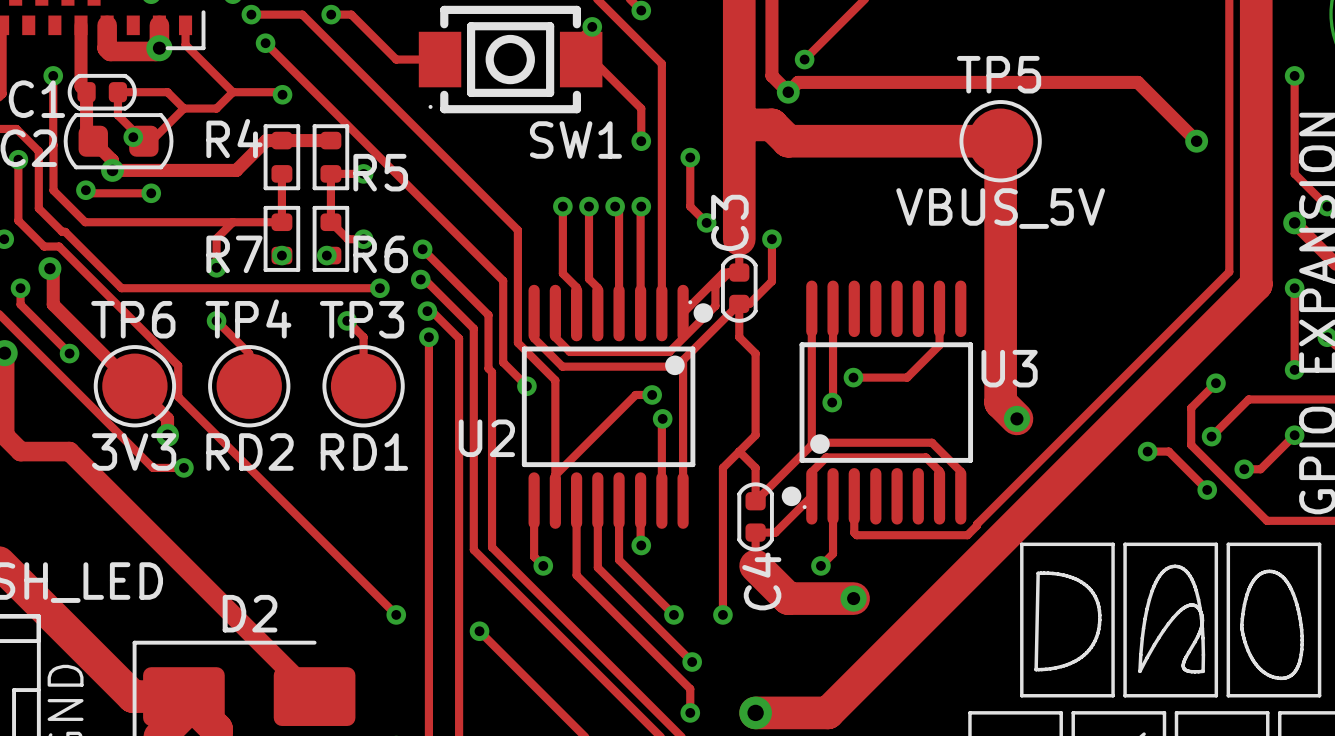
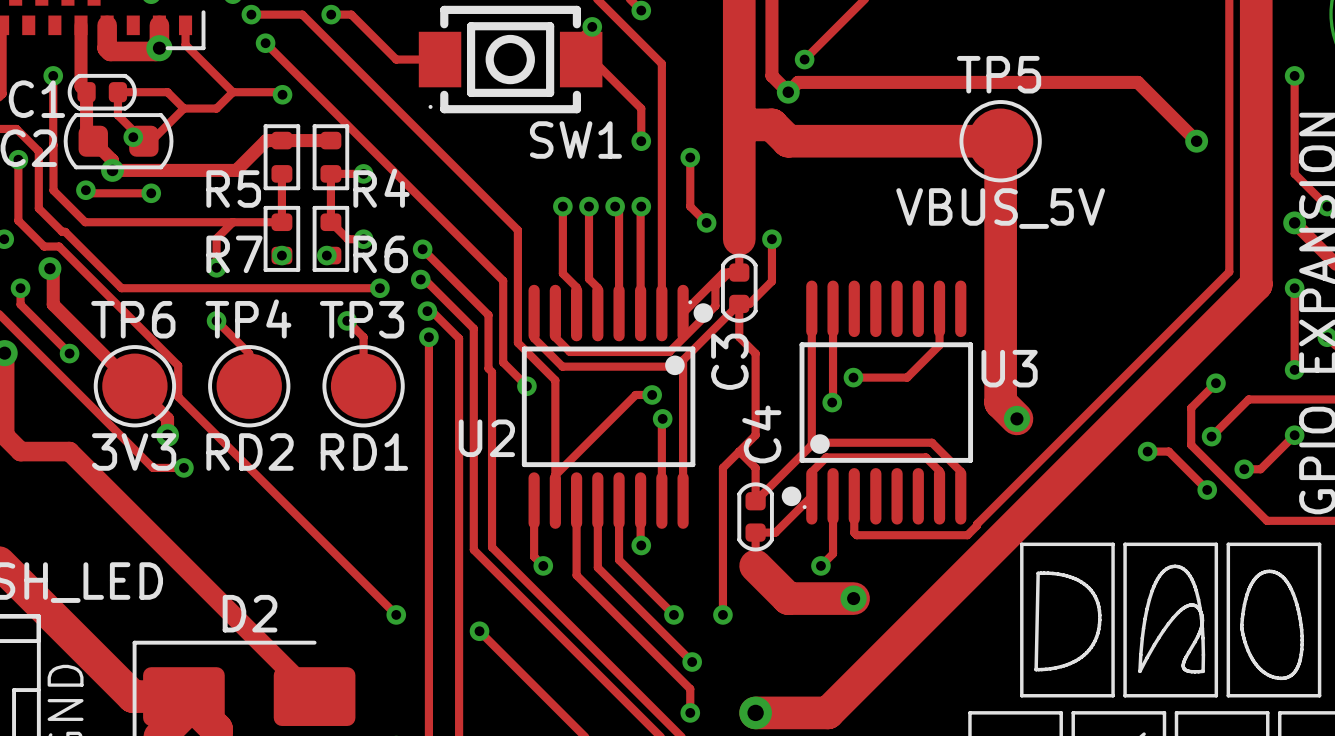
R4 name position: R4 (234, 138) -> R4 (381, 188)
R5 name position: R5 (380, 172) -> R5 (233, 189)
C3 name position: C3 (729, 222) -> C3 (729, 361)
C4 name position: C4 (761, 581) -> C4 (761, 434)

